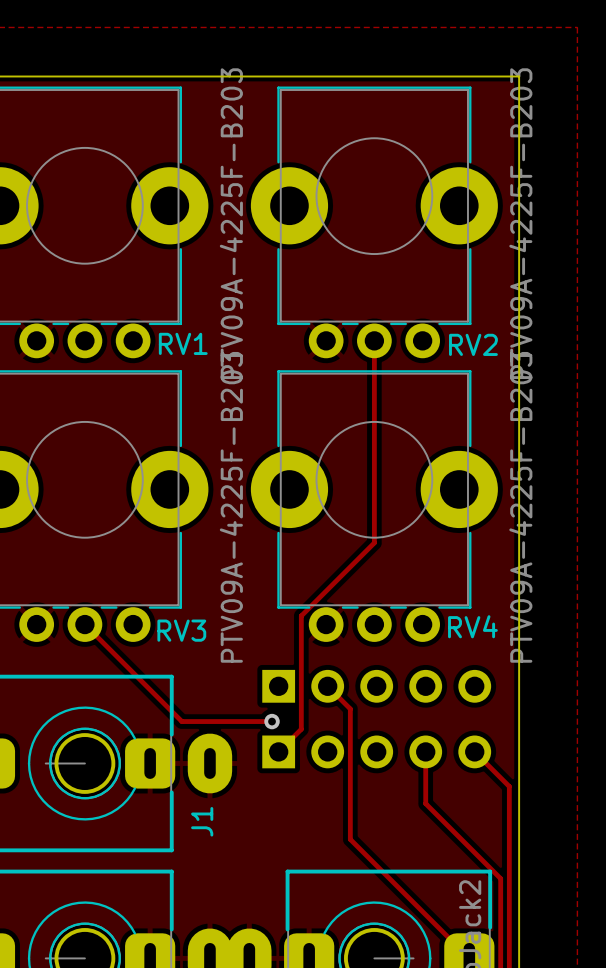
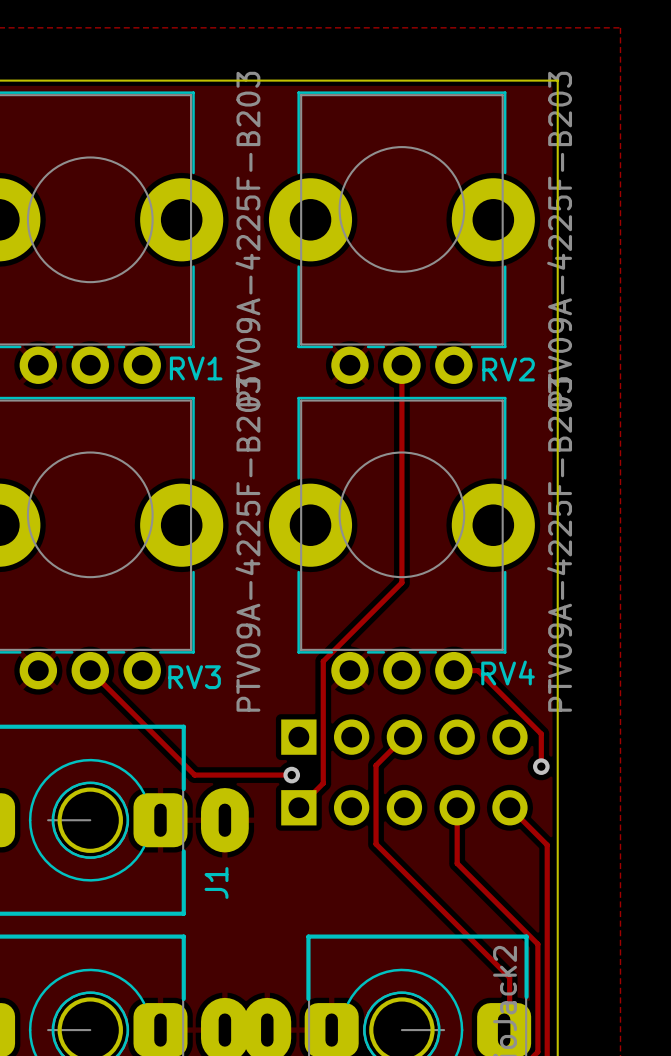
track: none -> (453, 670) (477, 670) (541, 733) (541, 766)
track: (327, 686) (350, 708) (350, 712) -> (404, 737) (376, 765)
via: none -> (541, 766)
track: (350, 785) (350, 839) (469, 958) -> (376, 844) (509, 977) (509, 1024) (504, 1030)

